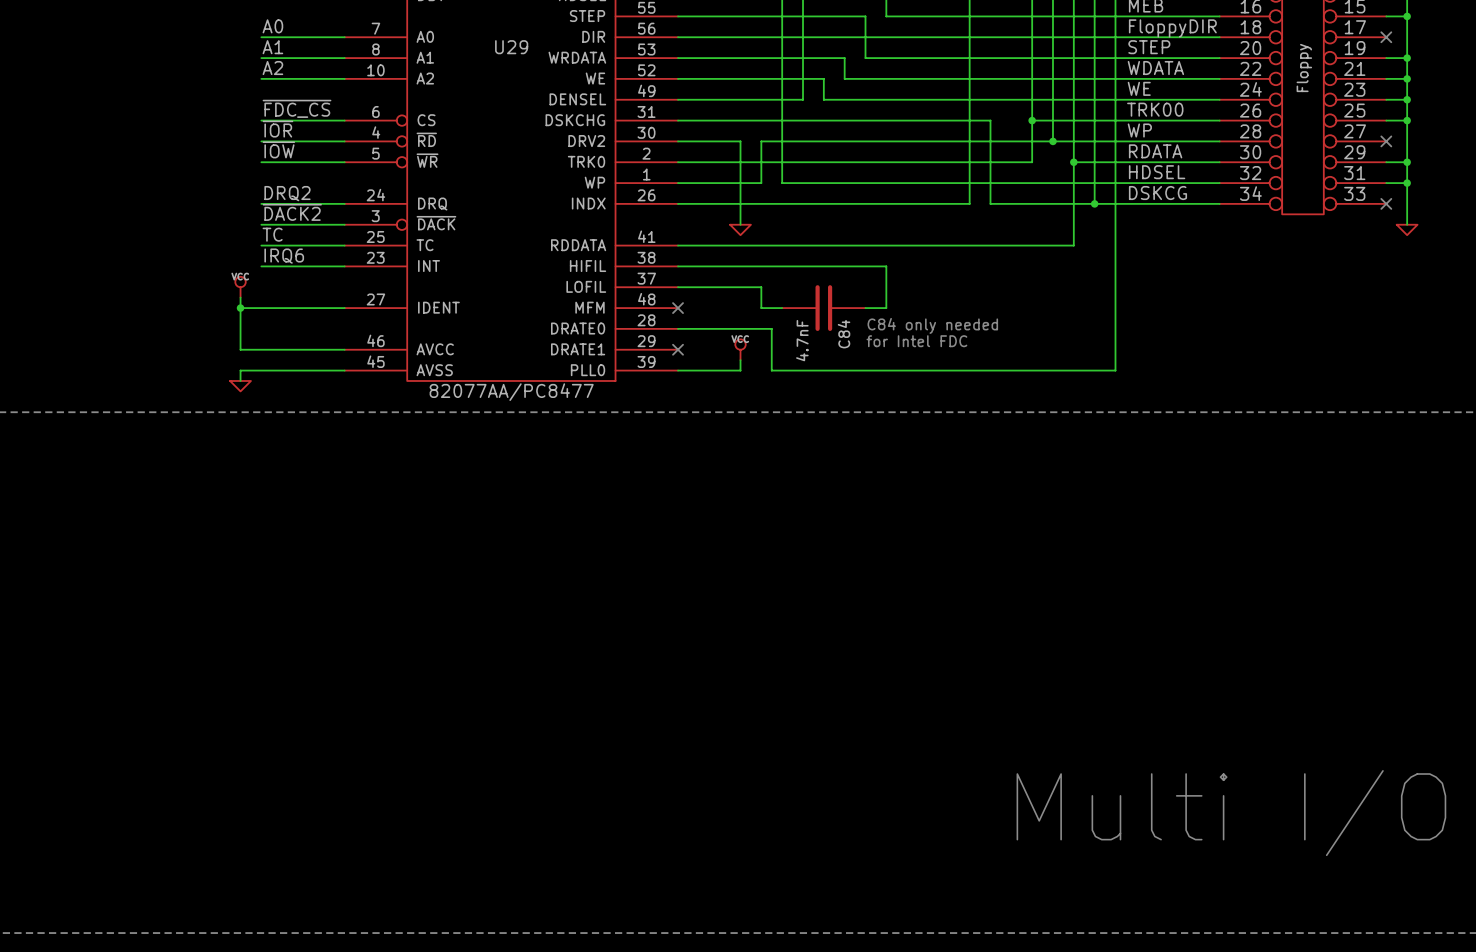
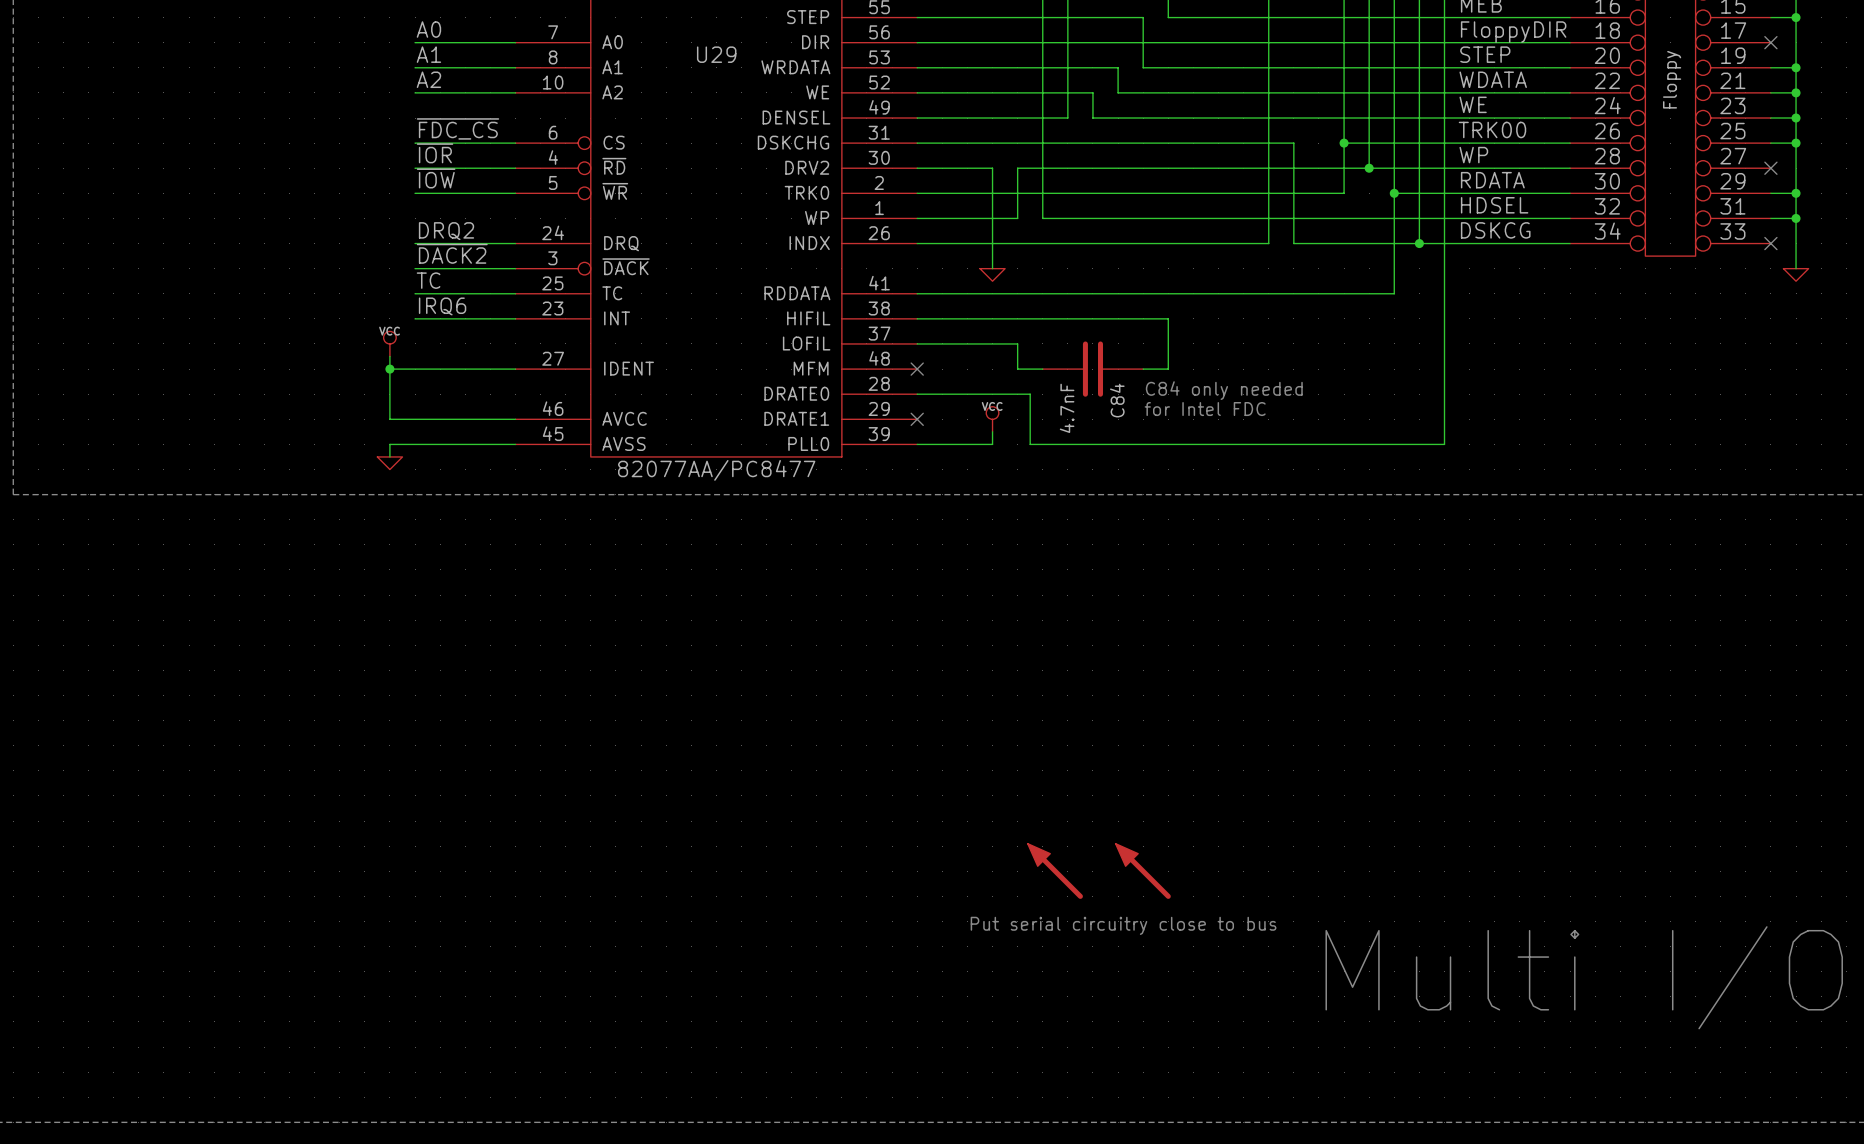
part: none -> (1055, 871)
part: none -> (1143, 871)
text: none -> Put serial circuitry close to bus (1123, 925)

